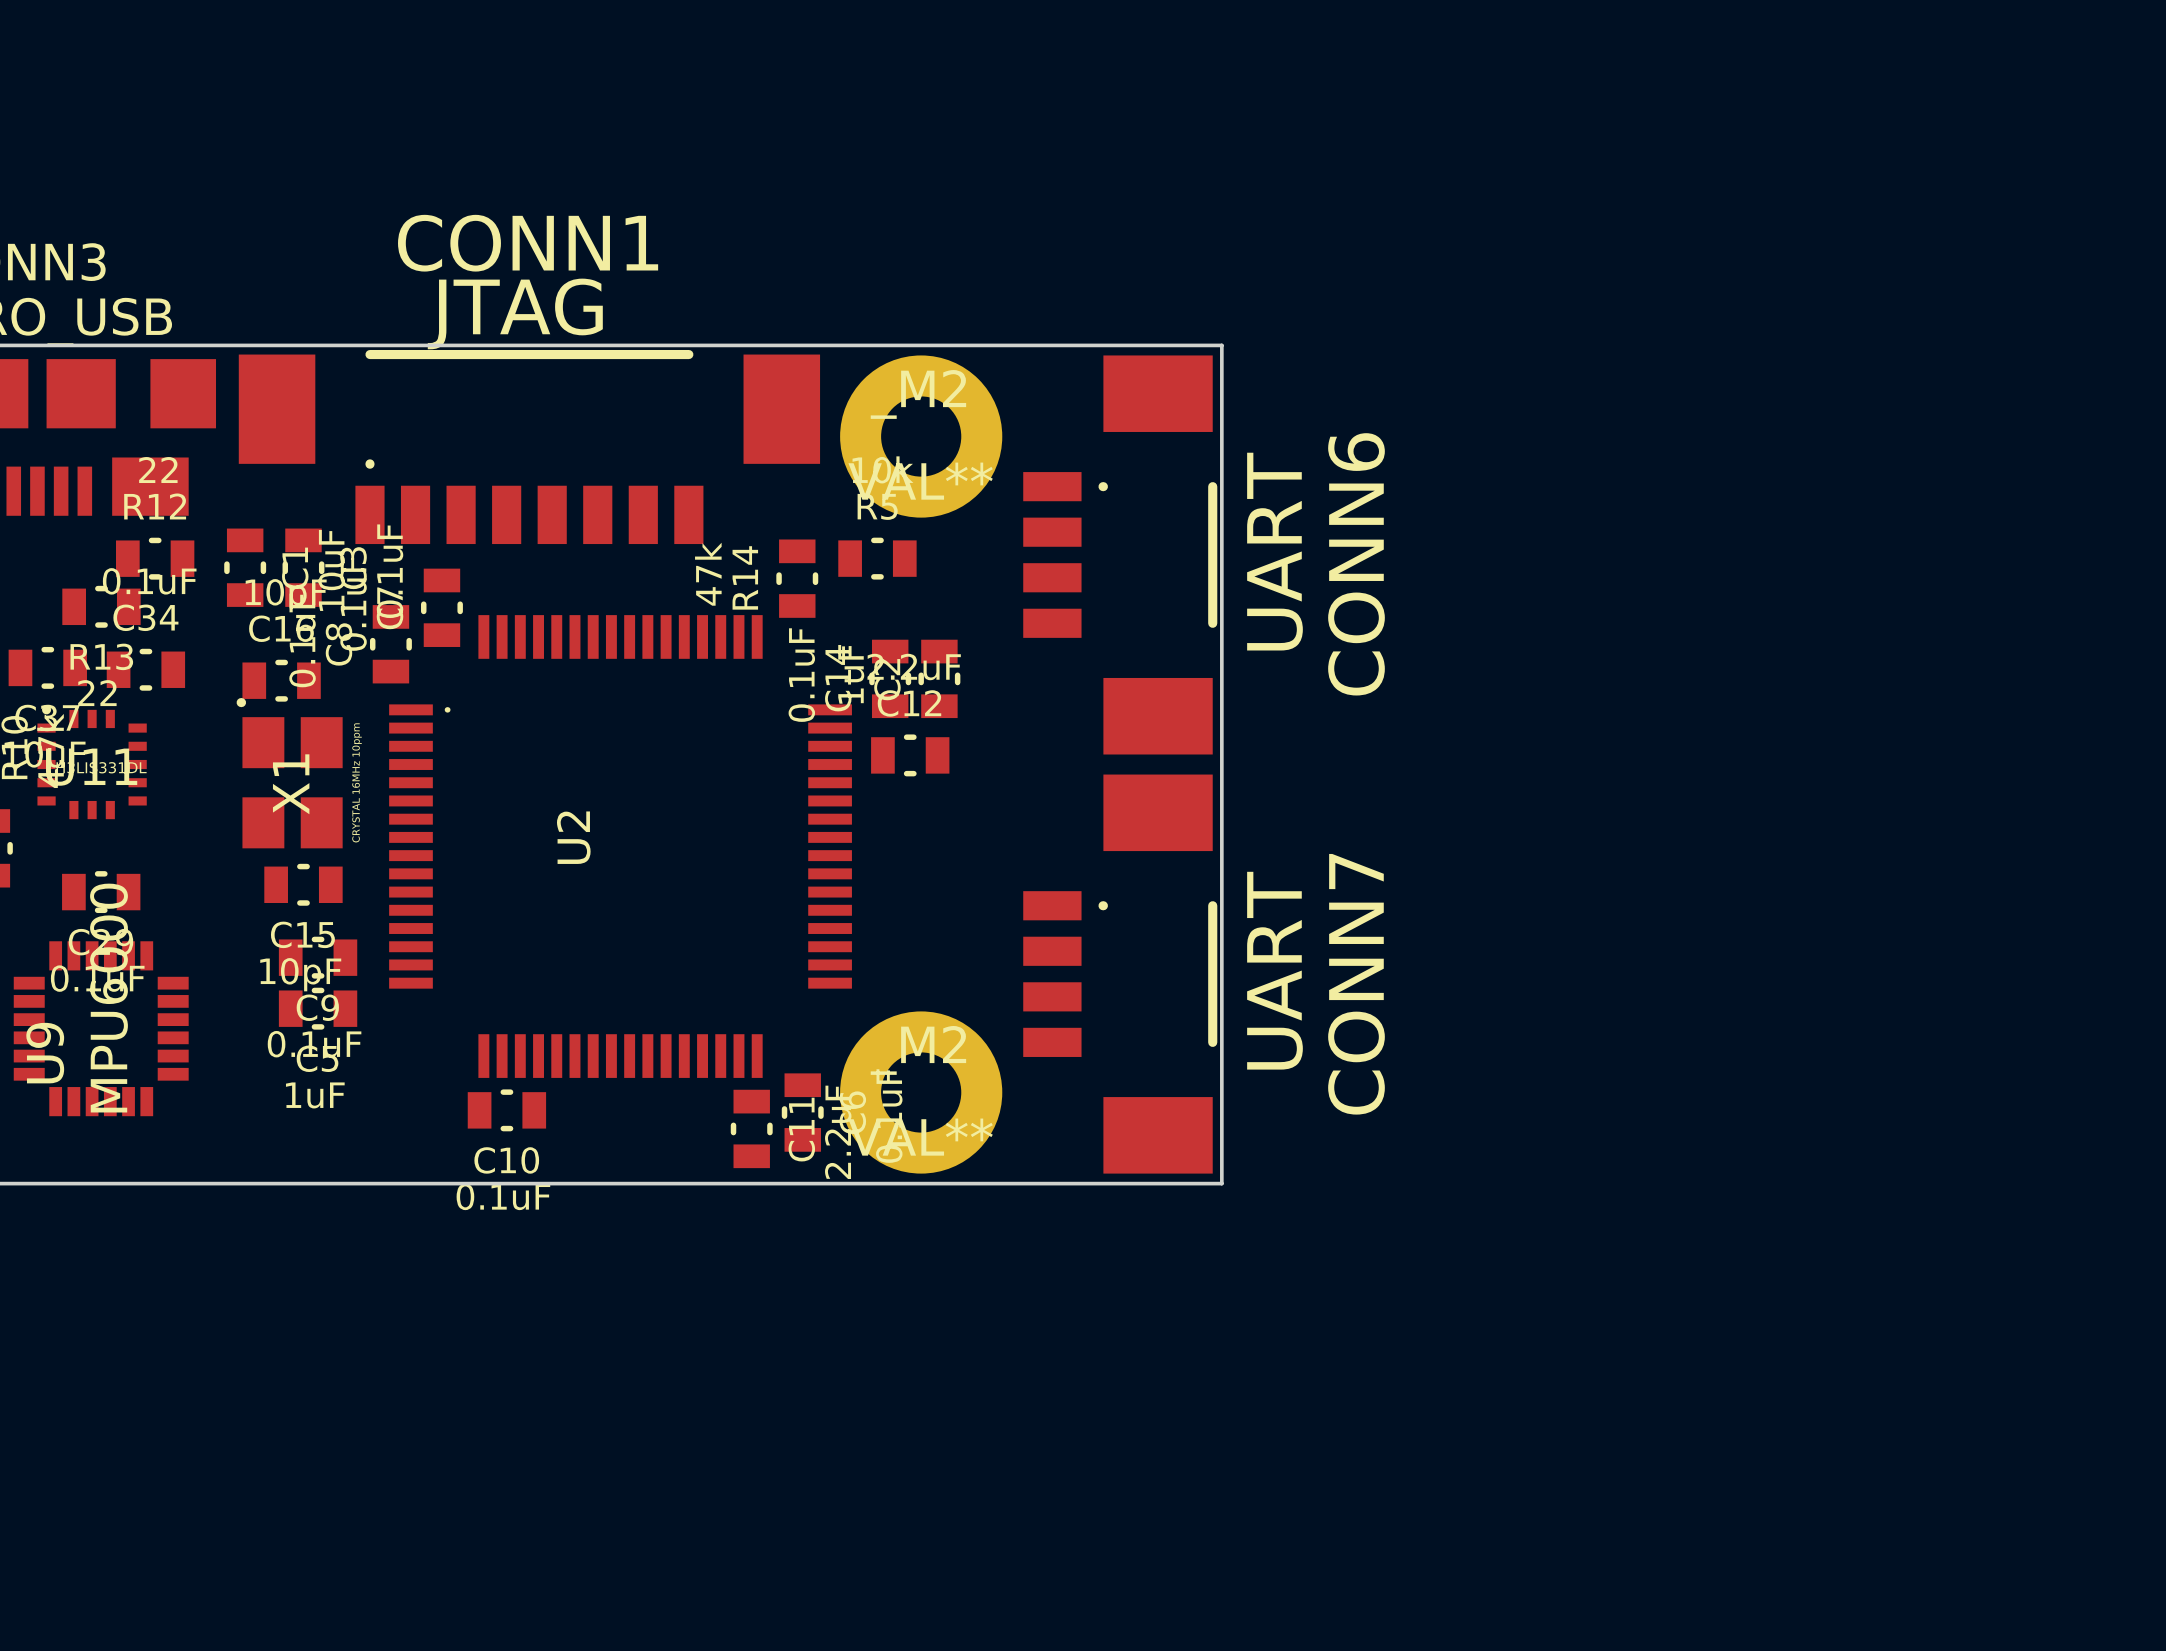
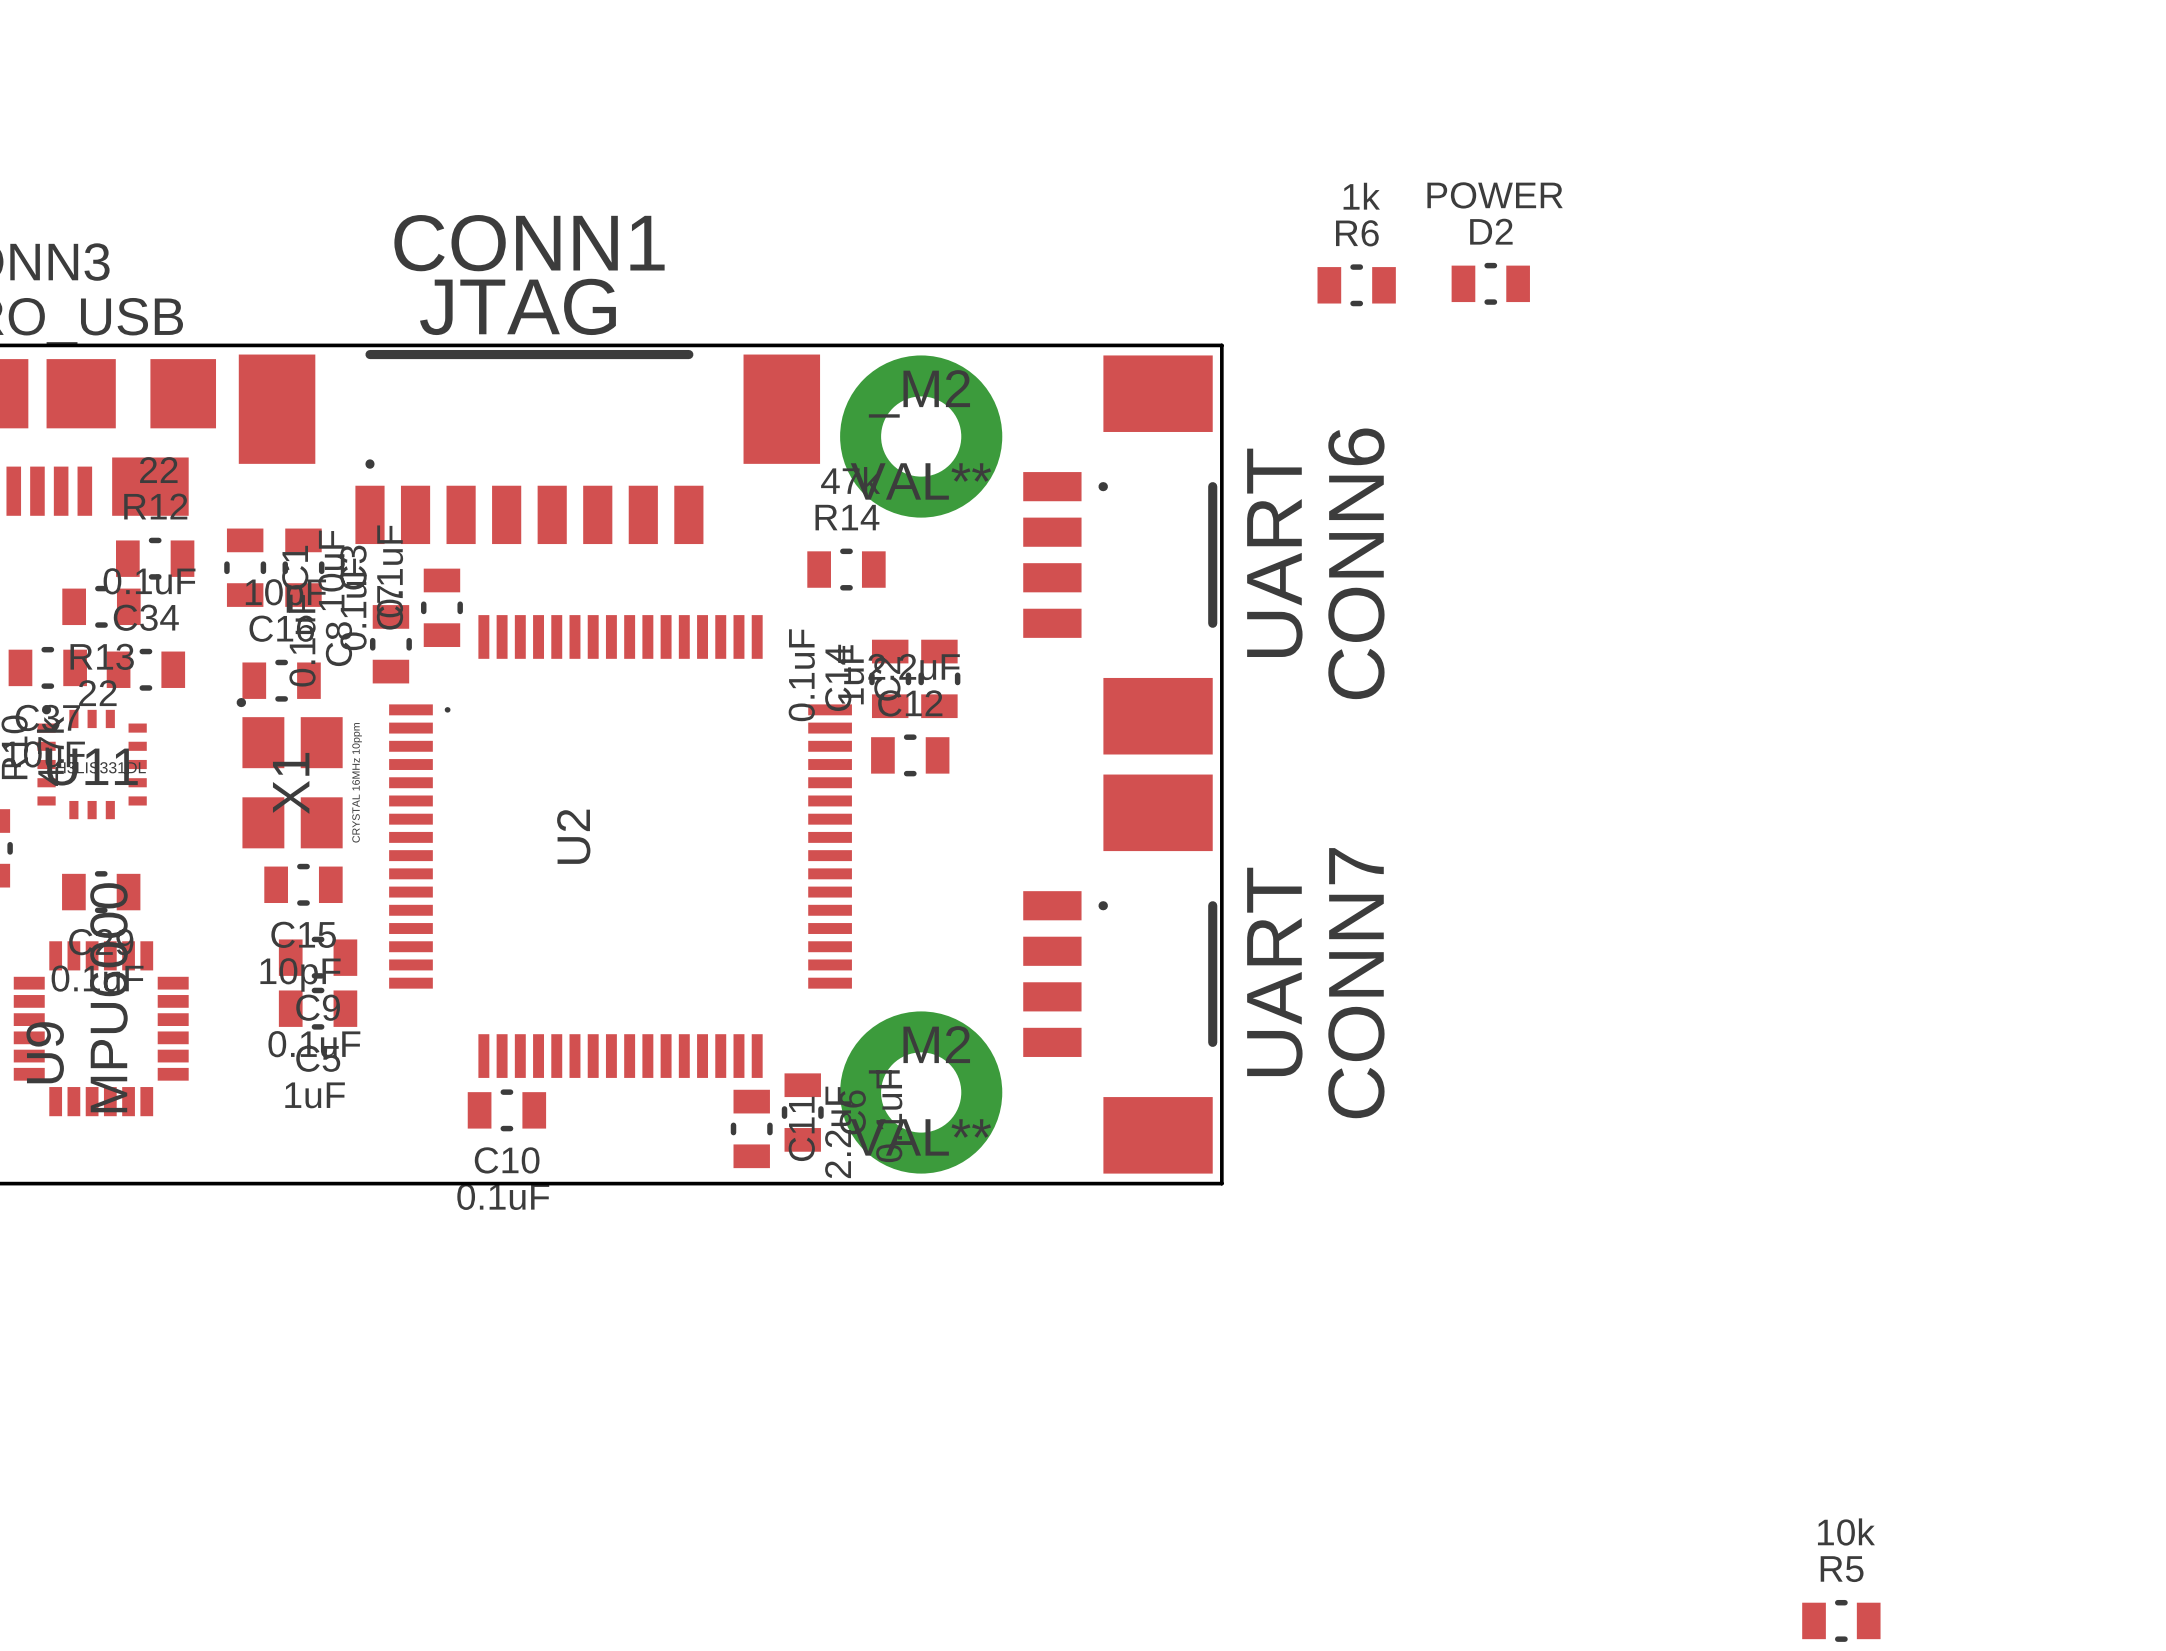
D2: none -> POWER (1490, 283)
R6: none -> 1k (1356, 285)
R5 position: (877, 558) -> (1841, 1620)
R14 rotation: 0° (797, 578) -> 90° clockwise (846, 569)
R14 position: (797, 578) -> (846, 569)

